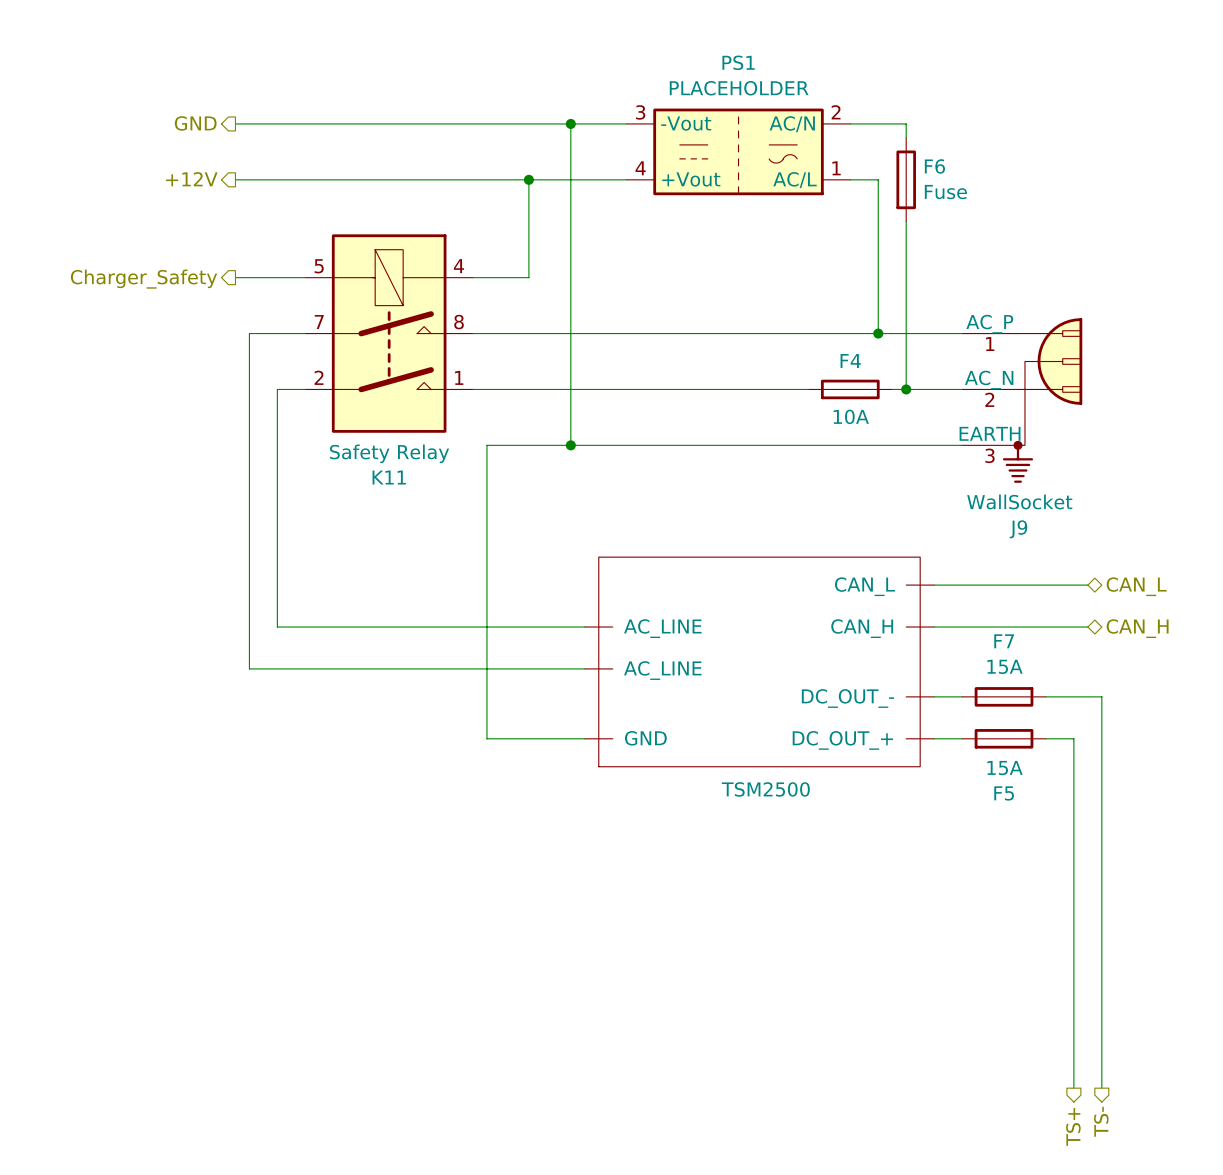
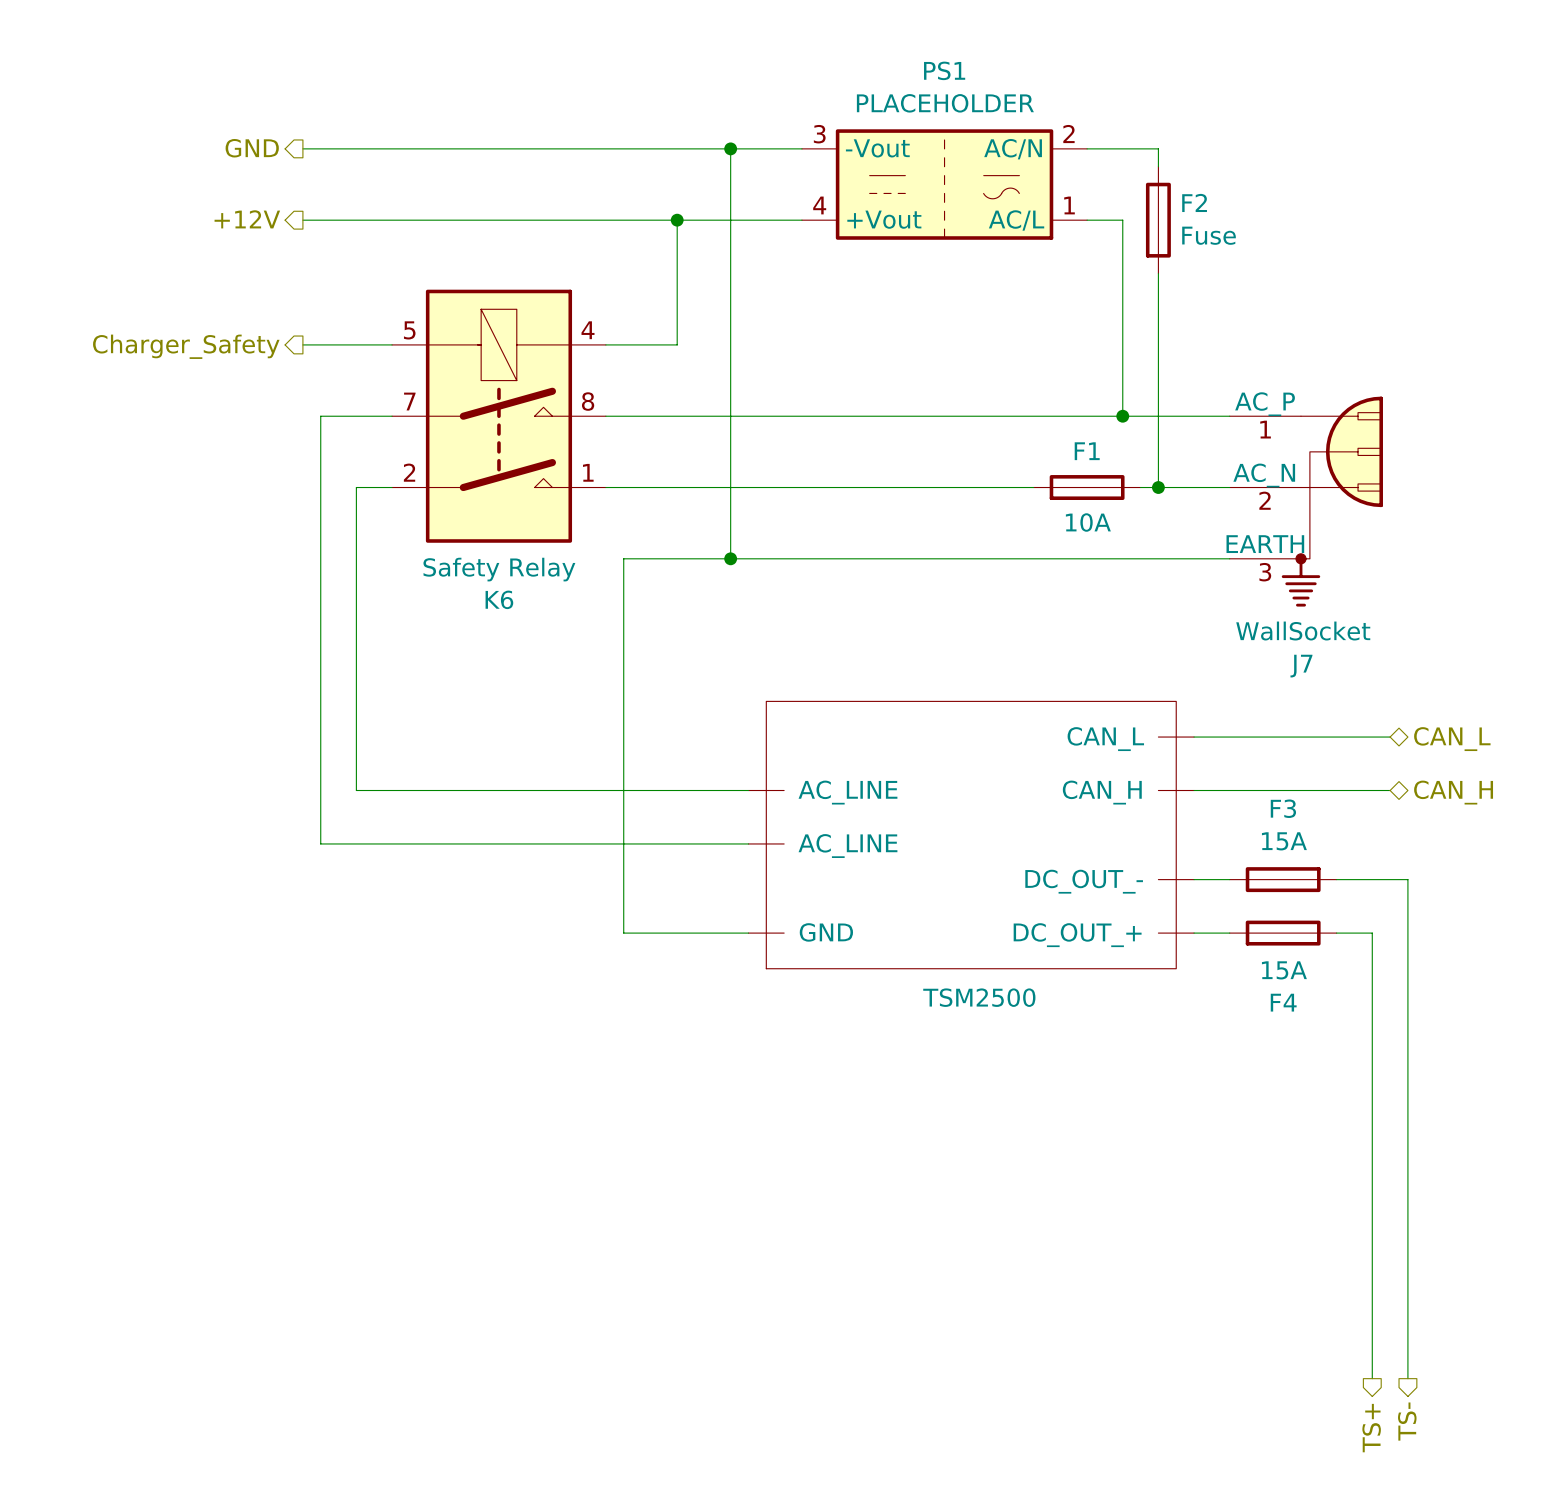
F6 name: F6 (934, 166) -> F2 (1194, 202)
F4 name: F4 (850, 360) -> F1 (1087, 451)
K11 name: K11 (389, 477) -> K6 (499, 599)
J9 name: J9 (1018, 529) -> J7 (1301, 666)
F7 name: F7 (1004, 641) -> F3 (1283, 808)
F5 name: F5 (1004, 793) -> F4 (1283, 1002)

